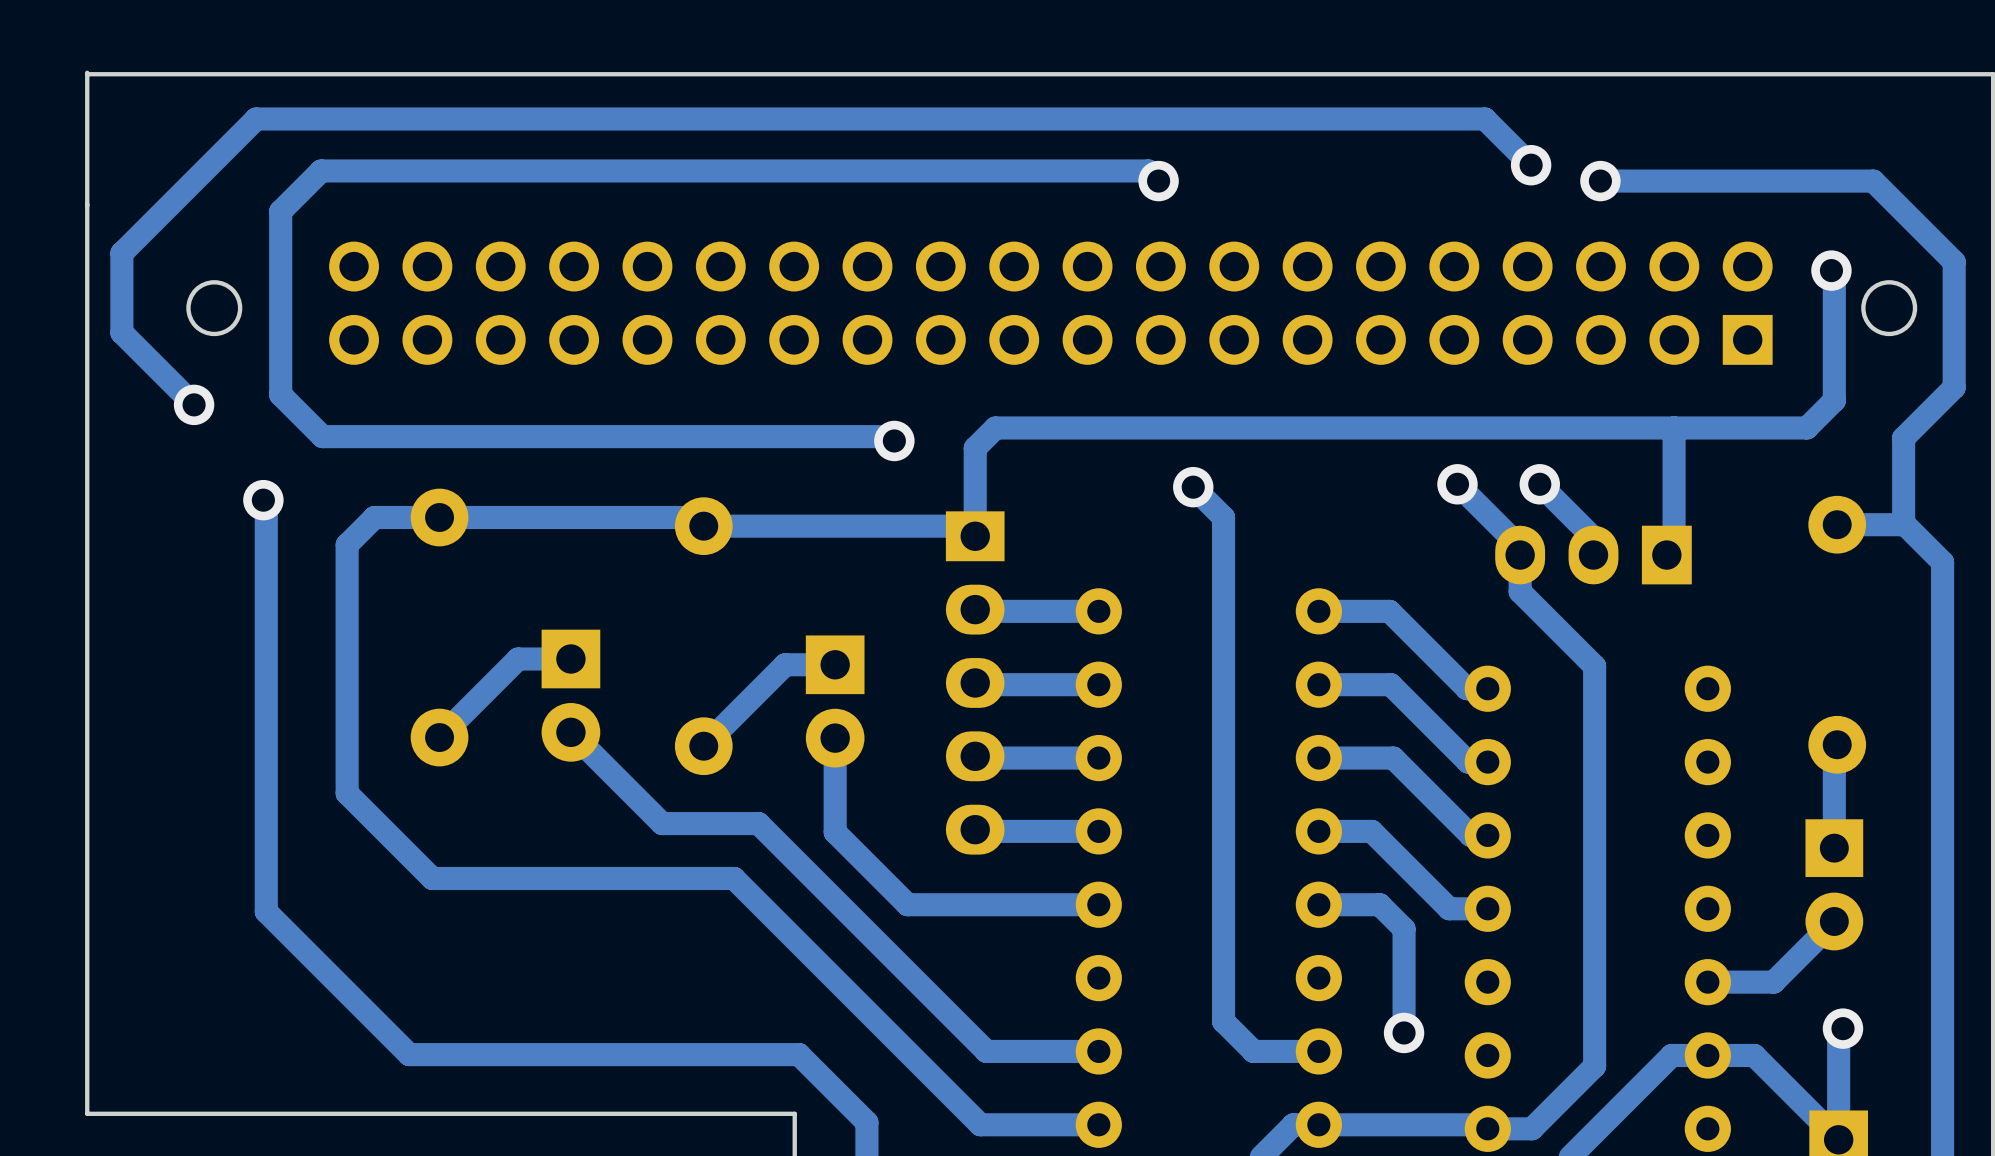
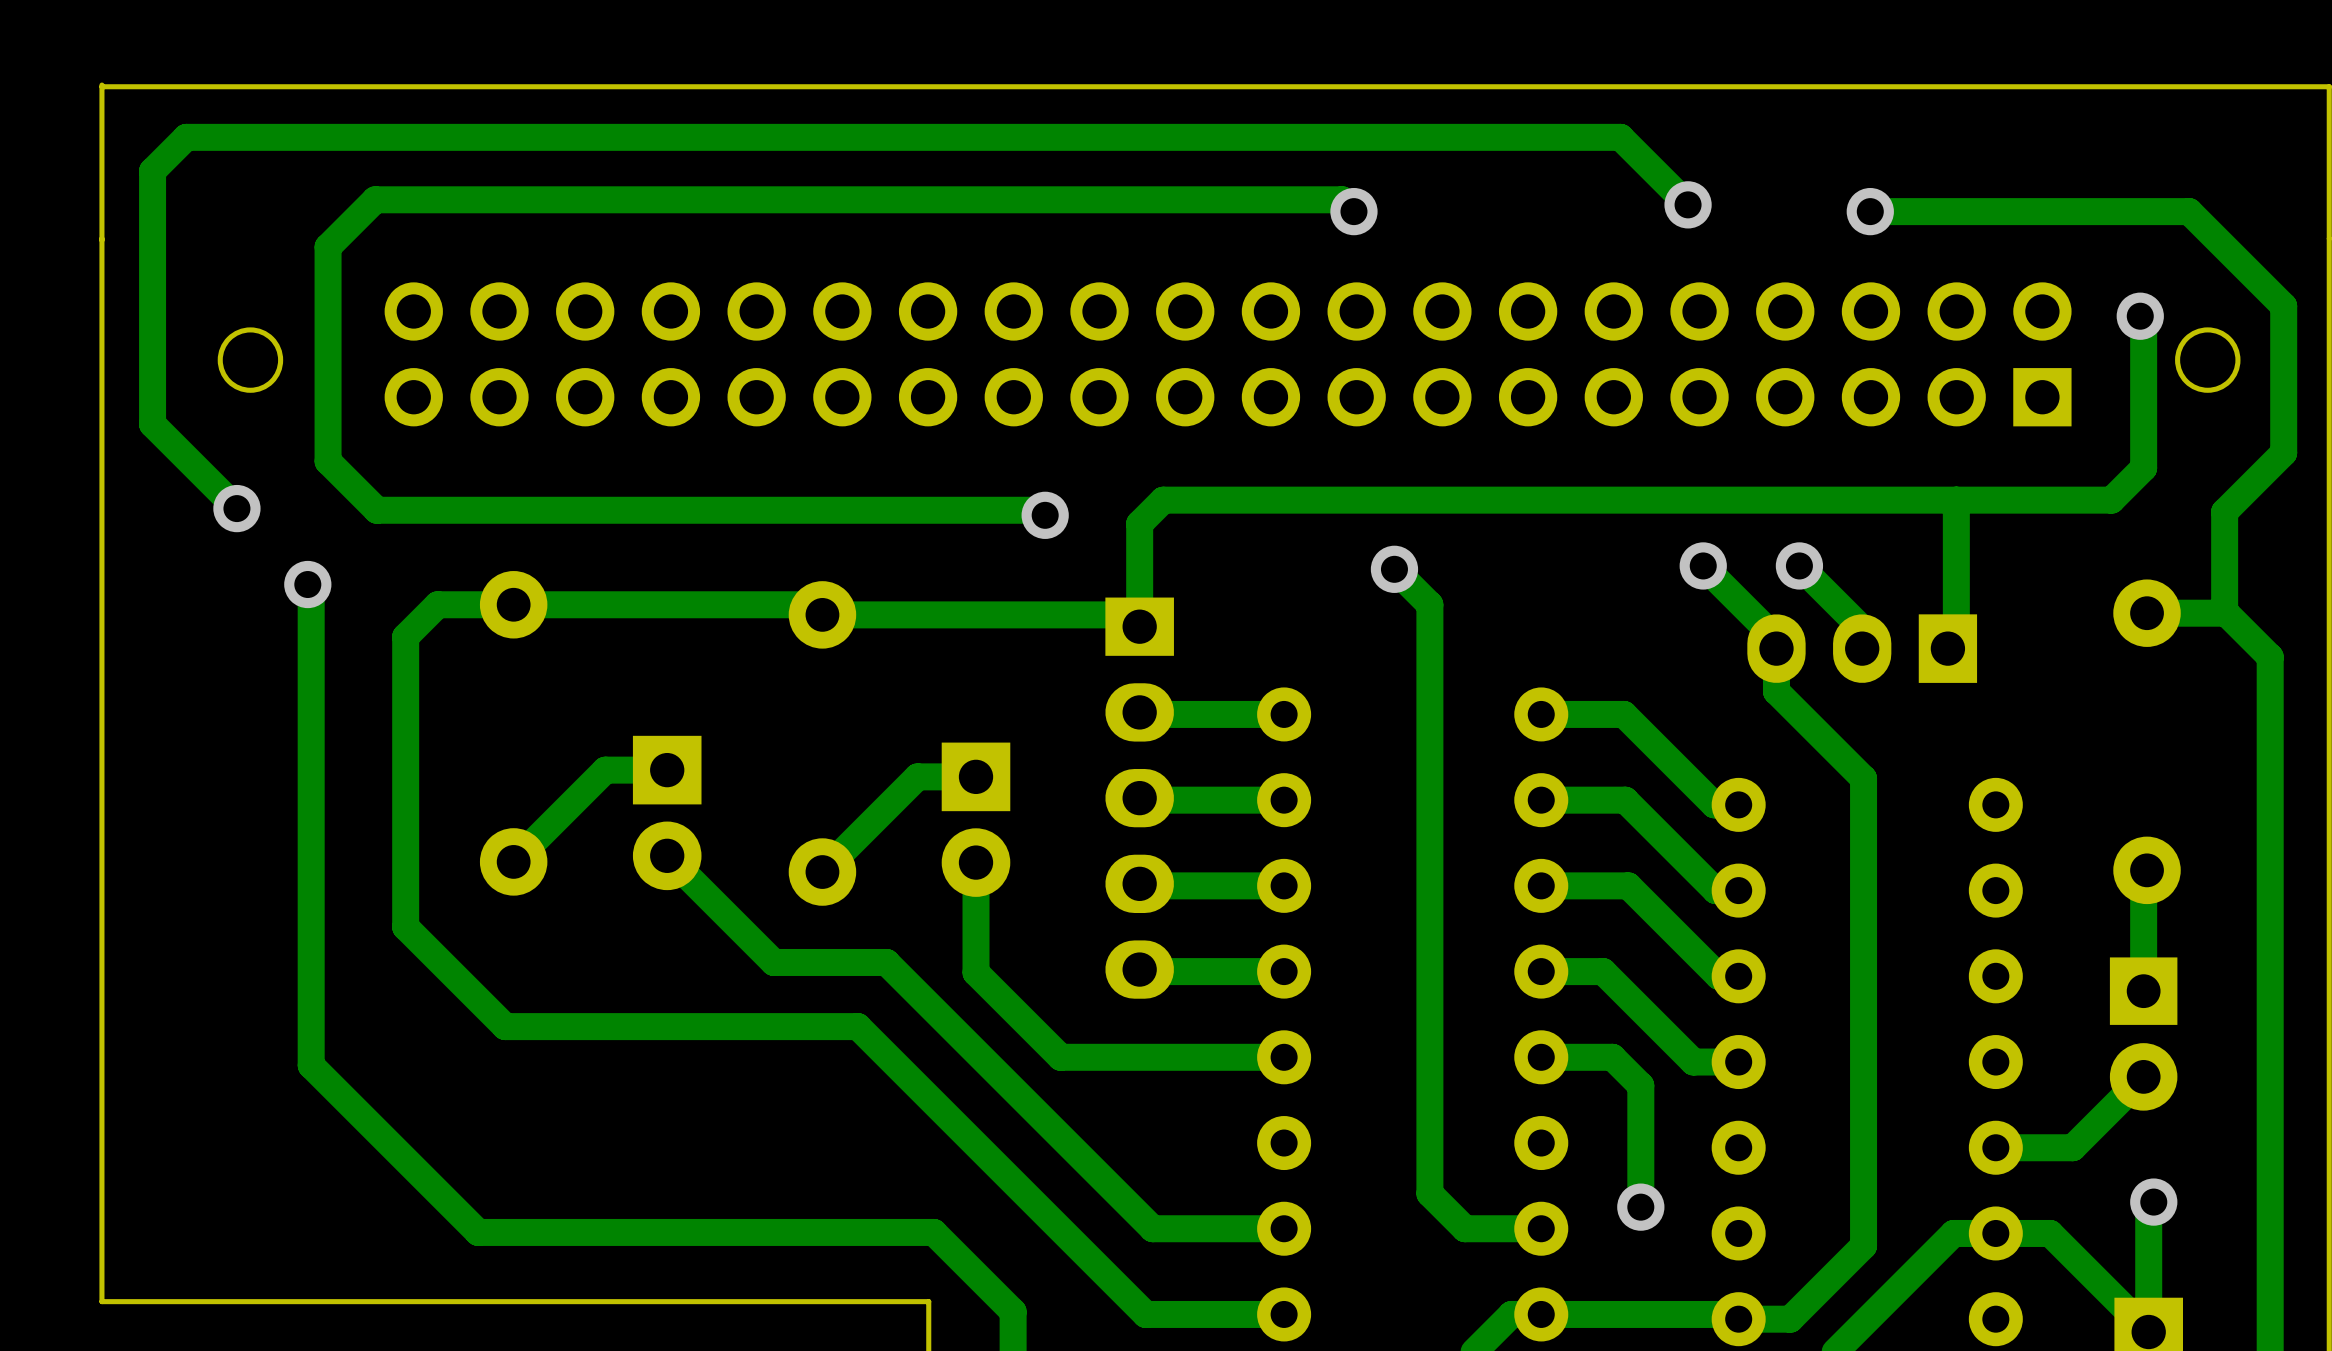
track: (1531, 165) (1484, 118) (256, 118) (121, 253) (121, 332) (194, 404) -> none
via position: (1531, 165) -> (1688, 204)
track: none -> (1688, 204) (1620, 137) (186, 137) (152, 171) (152, 424) (236, 508)
via position: (194, 404) -> (236, 508)

